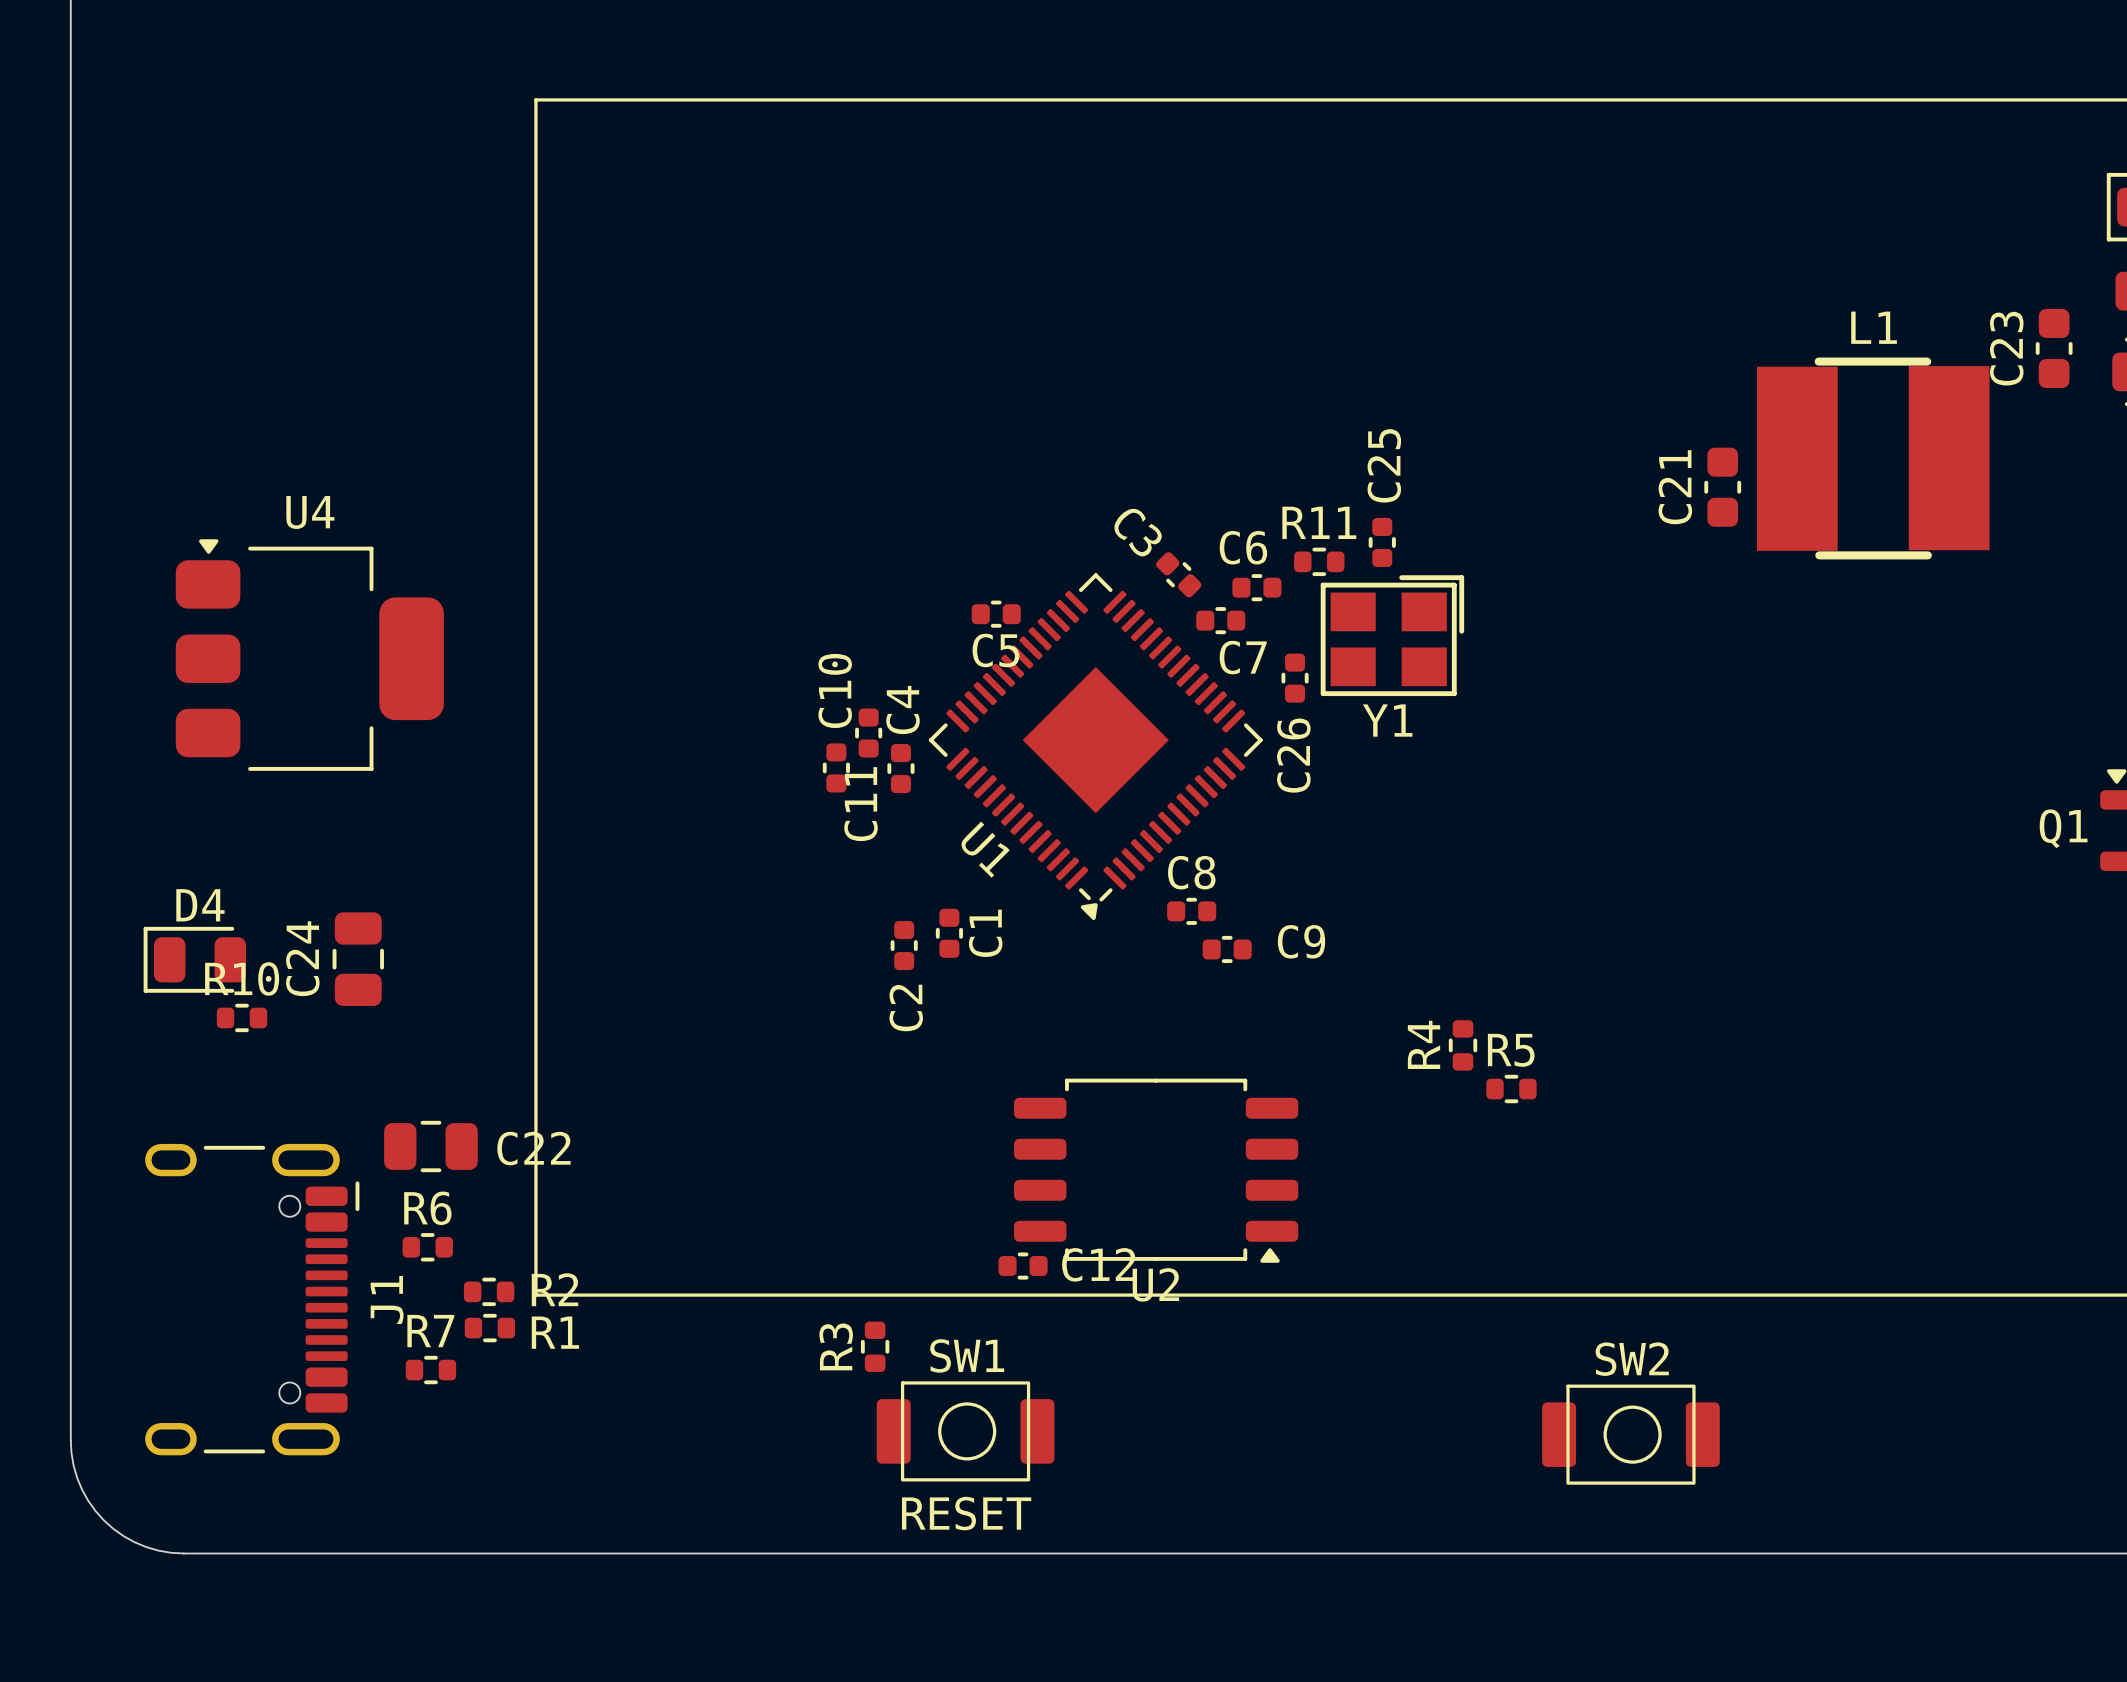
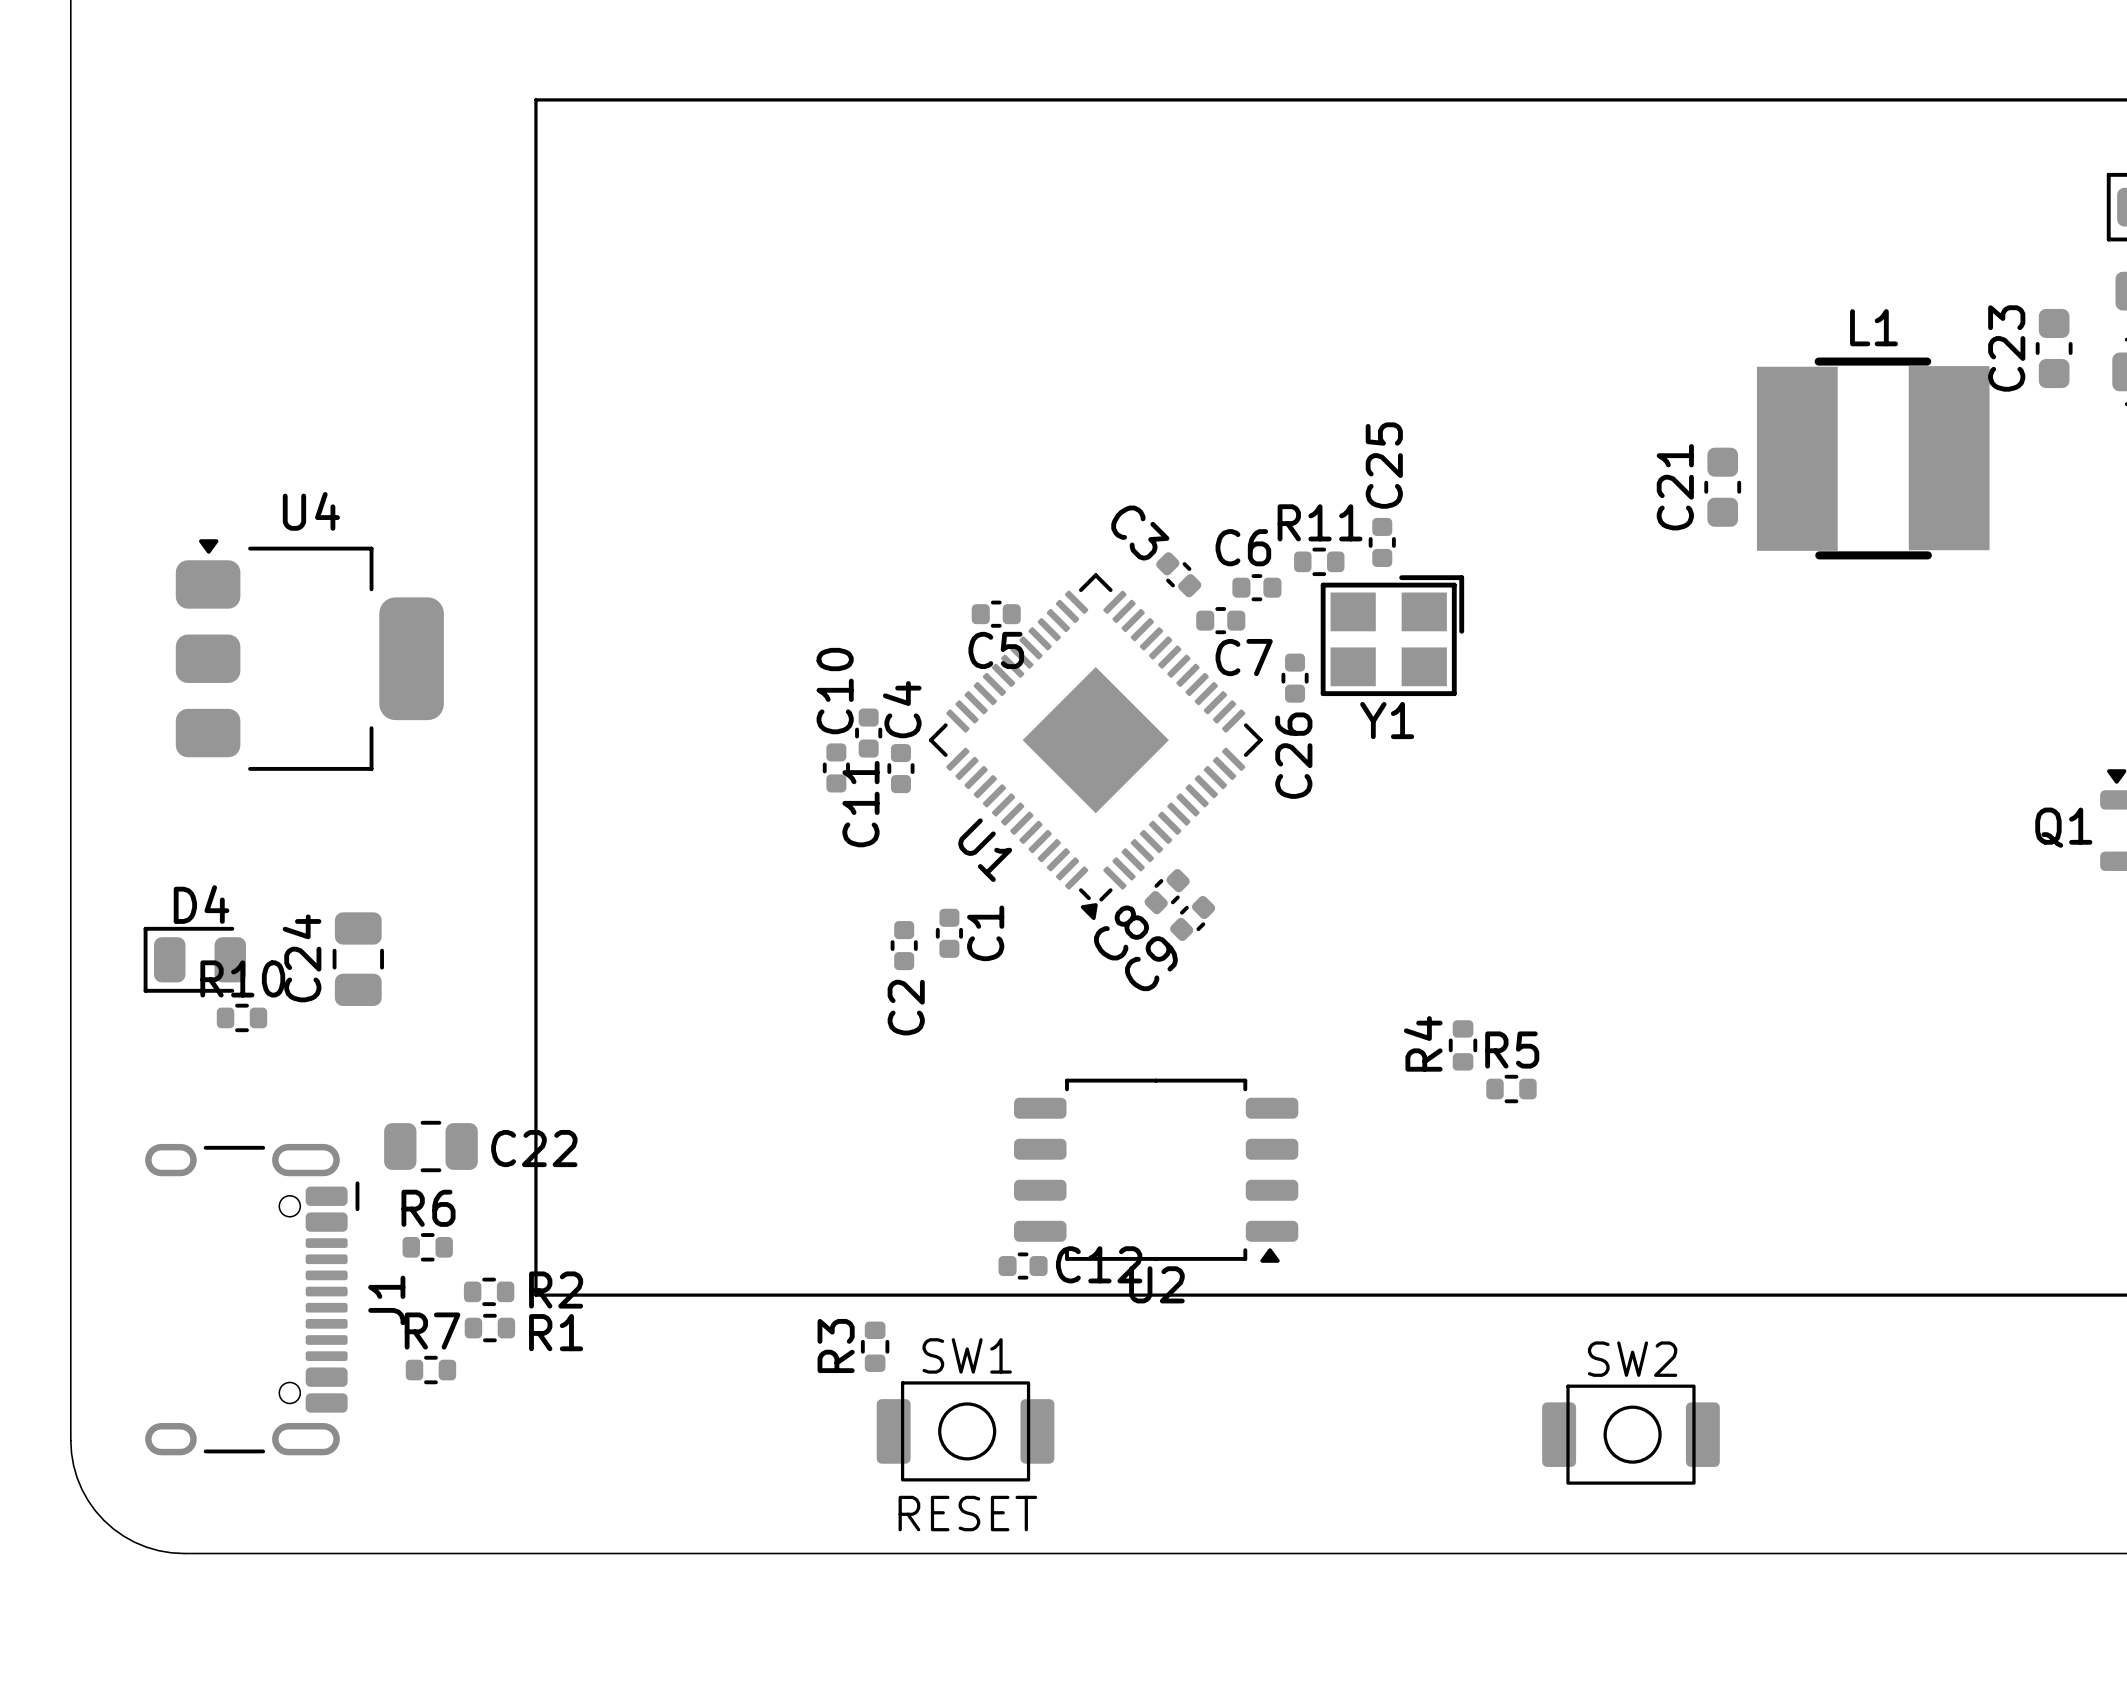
C8 name position: C8 (1191, 872) -> C8 (1121, 932)
C8 rotation: 0° (1191, 911) -> 45° counterclockwise (1167, 891)
C8 position: (1191, 911) -> (1167, 891)
C9 name position: C9 (1301, 941) -> C9 (1151, 963)
C9 rotation: 0° (1227, 949) -> 45° counterclockwise (1192, 918)
C9 position: (1227, 949) -> (1192, 918)

